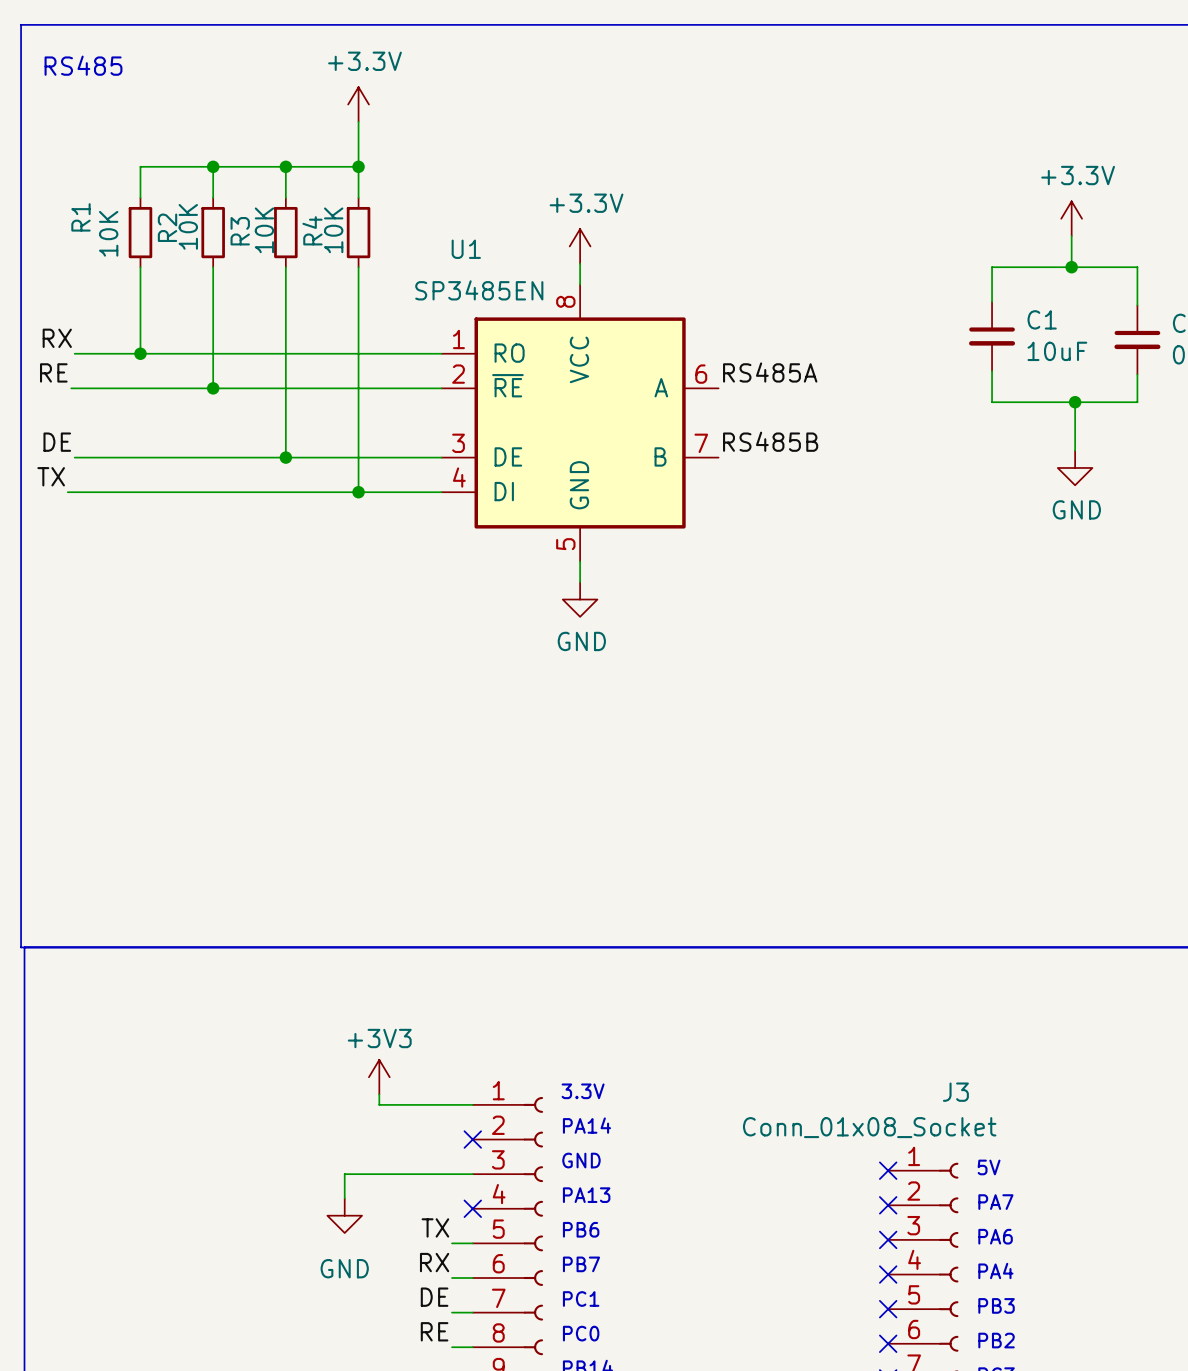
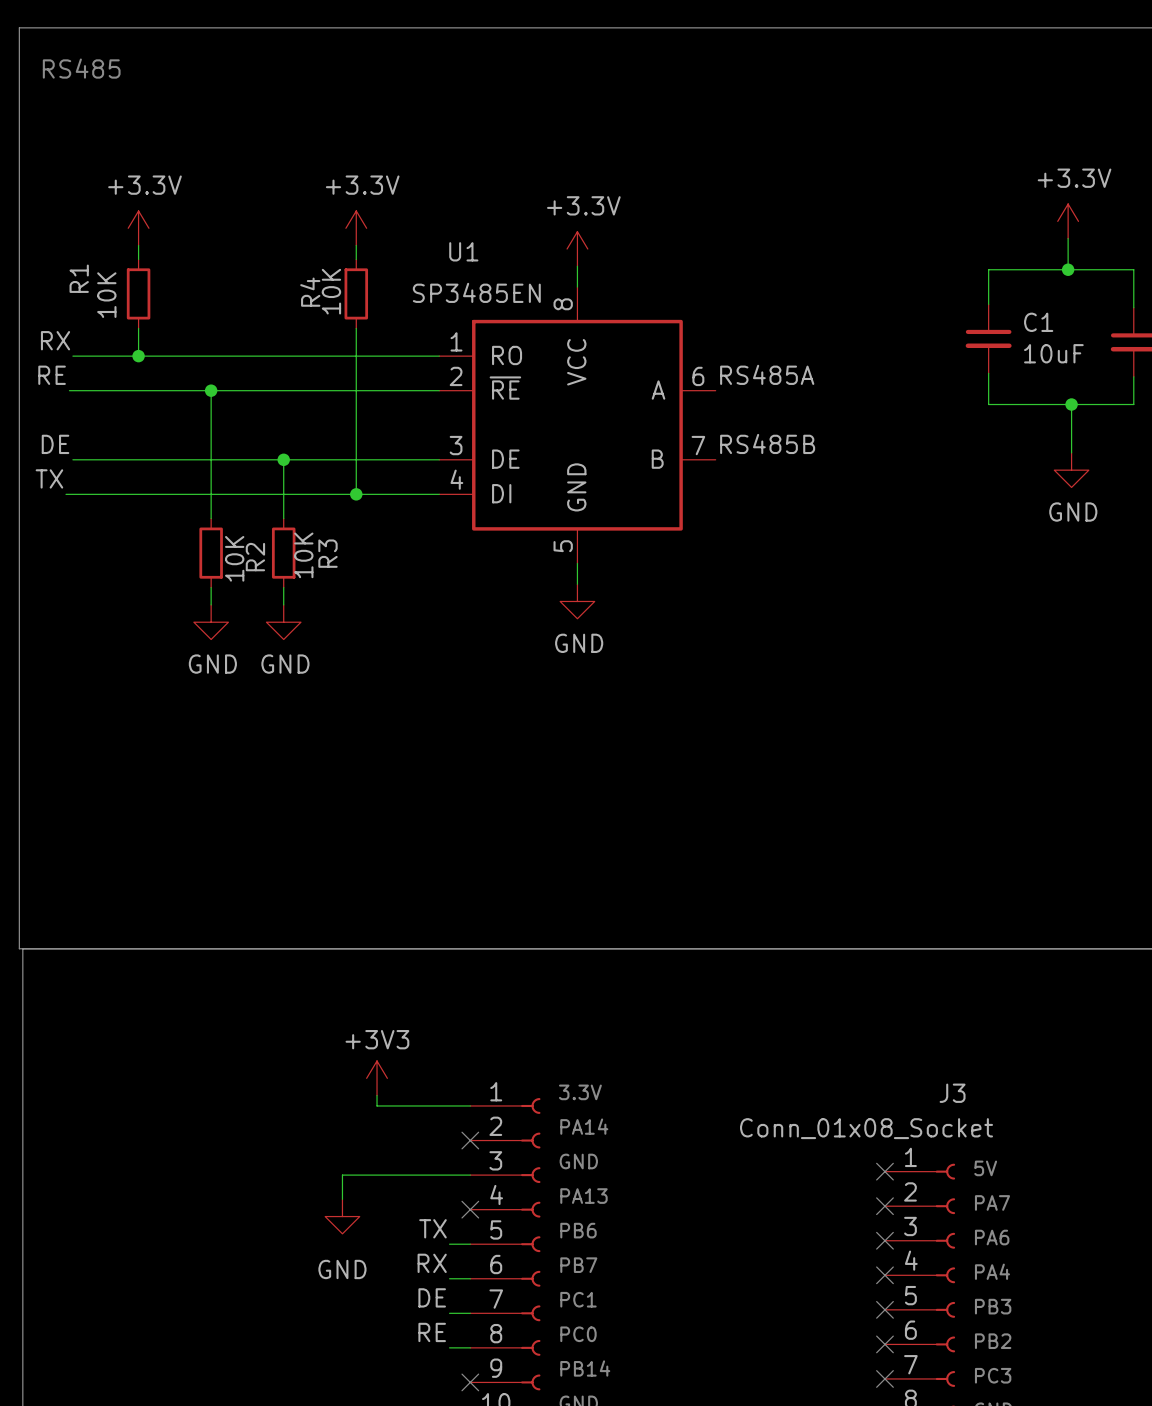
power symbol position: +3.3V (358, 104) -> +3.3V (356, 228)
wire: (358, 121) (358, 197) -> none
wire: (213, 166) (213, 197) -> none
junction: (213, 166) -> none
wire: (285, 166) (285, 197) -> none
junction: (285, 166) -> none
wire: (358, 166) (140, 166) (140, 197) -> none
junction: (358, 166) -> none
power symbol: none -> +3.3V (138, 228)
R2 value position: 10K (188, 226) -> 10K (234, 558)
R2 name position: R2 (167, 227) -> R2 (255, 557)
R3 value position: 10K (264, 230) -> 10K (303, 555)
R3 name position: R3 (240, 231) -> R3 (327, 553)
R1 position: (140, 232) -> (138, 293)
R2 position: (213, 232) -> (211, 553)
R3 position: (285, 232) -> (283, 553)
R4 position: (358, 232) -> (356, 293)
wire: none -> (138, 245) (138, 259)
wire: none -> (356, 245) (356, 259)
wire: (140, 267) (140, 326) -> none
wire: (213, 267) (213, 388) -> (211, 518) (211, 390)
wire: (285, 267) (285, 457) -> (283, 518) (283, 459)
wire: (358, 267) (358, 326) -> none
wire: none -> (211, 587) (211, 604)
wire: none -> (283, 587) (283, 604)
power symbol: none -> GND (211, 622)
power symbol: none -> GND (283, 622)

